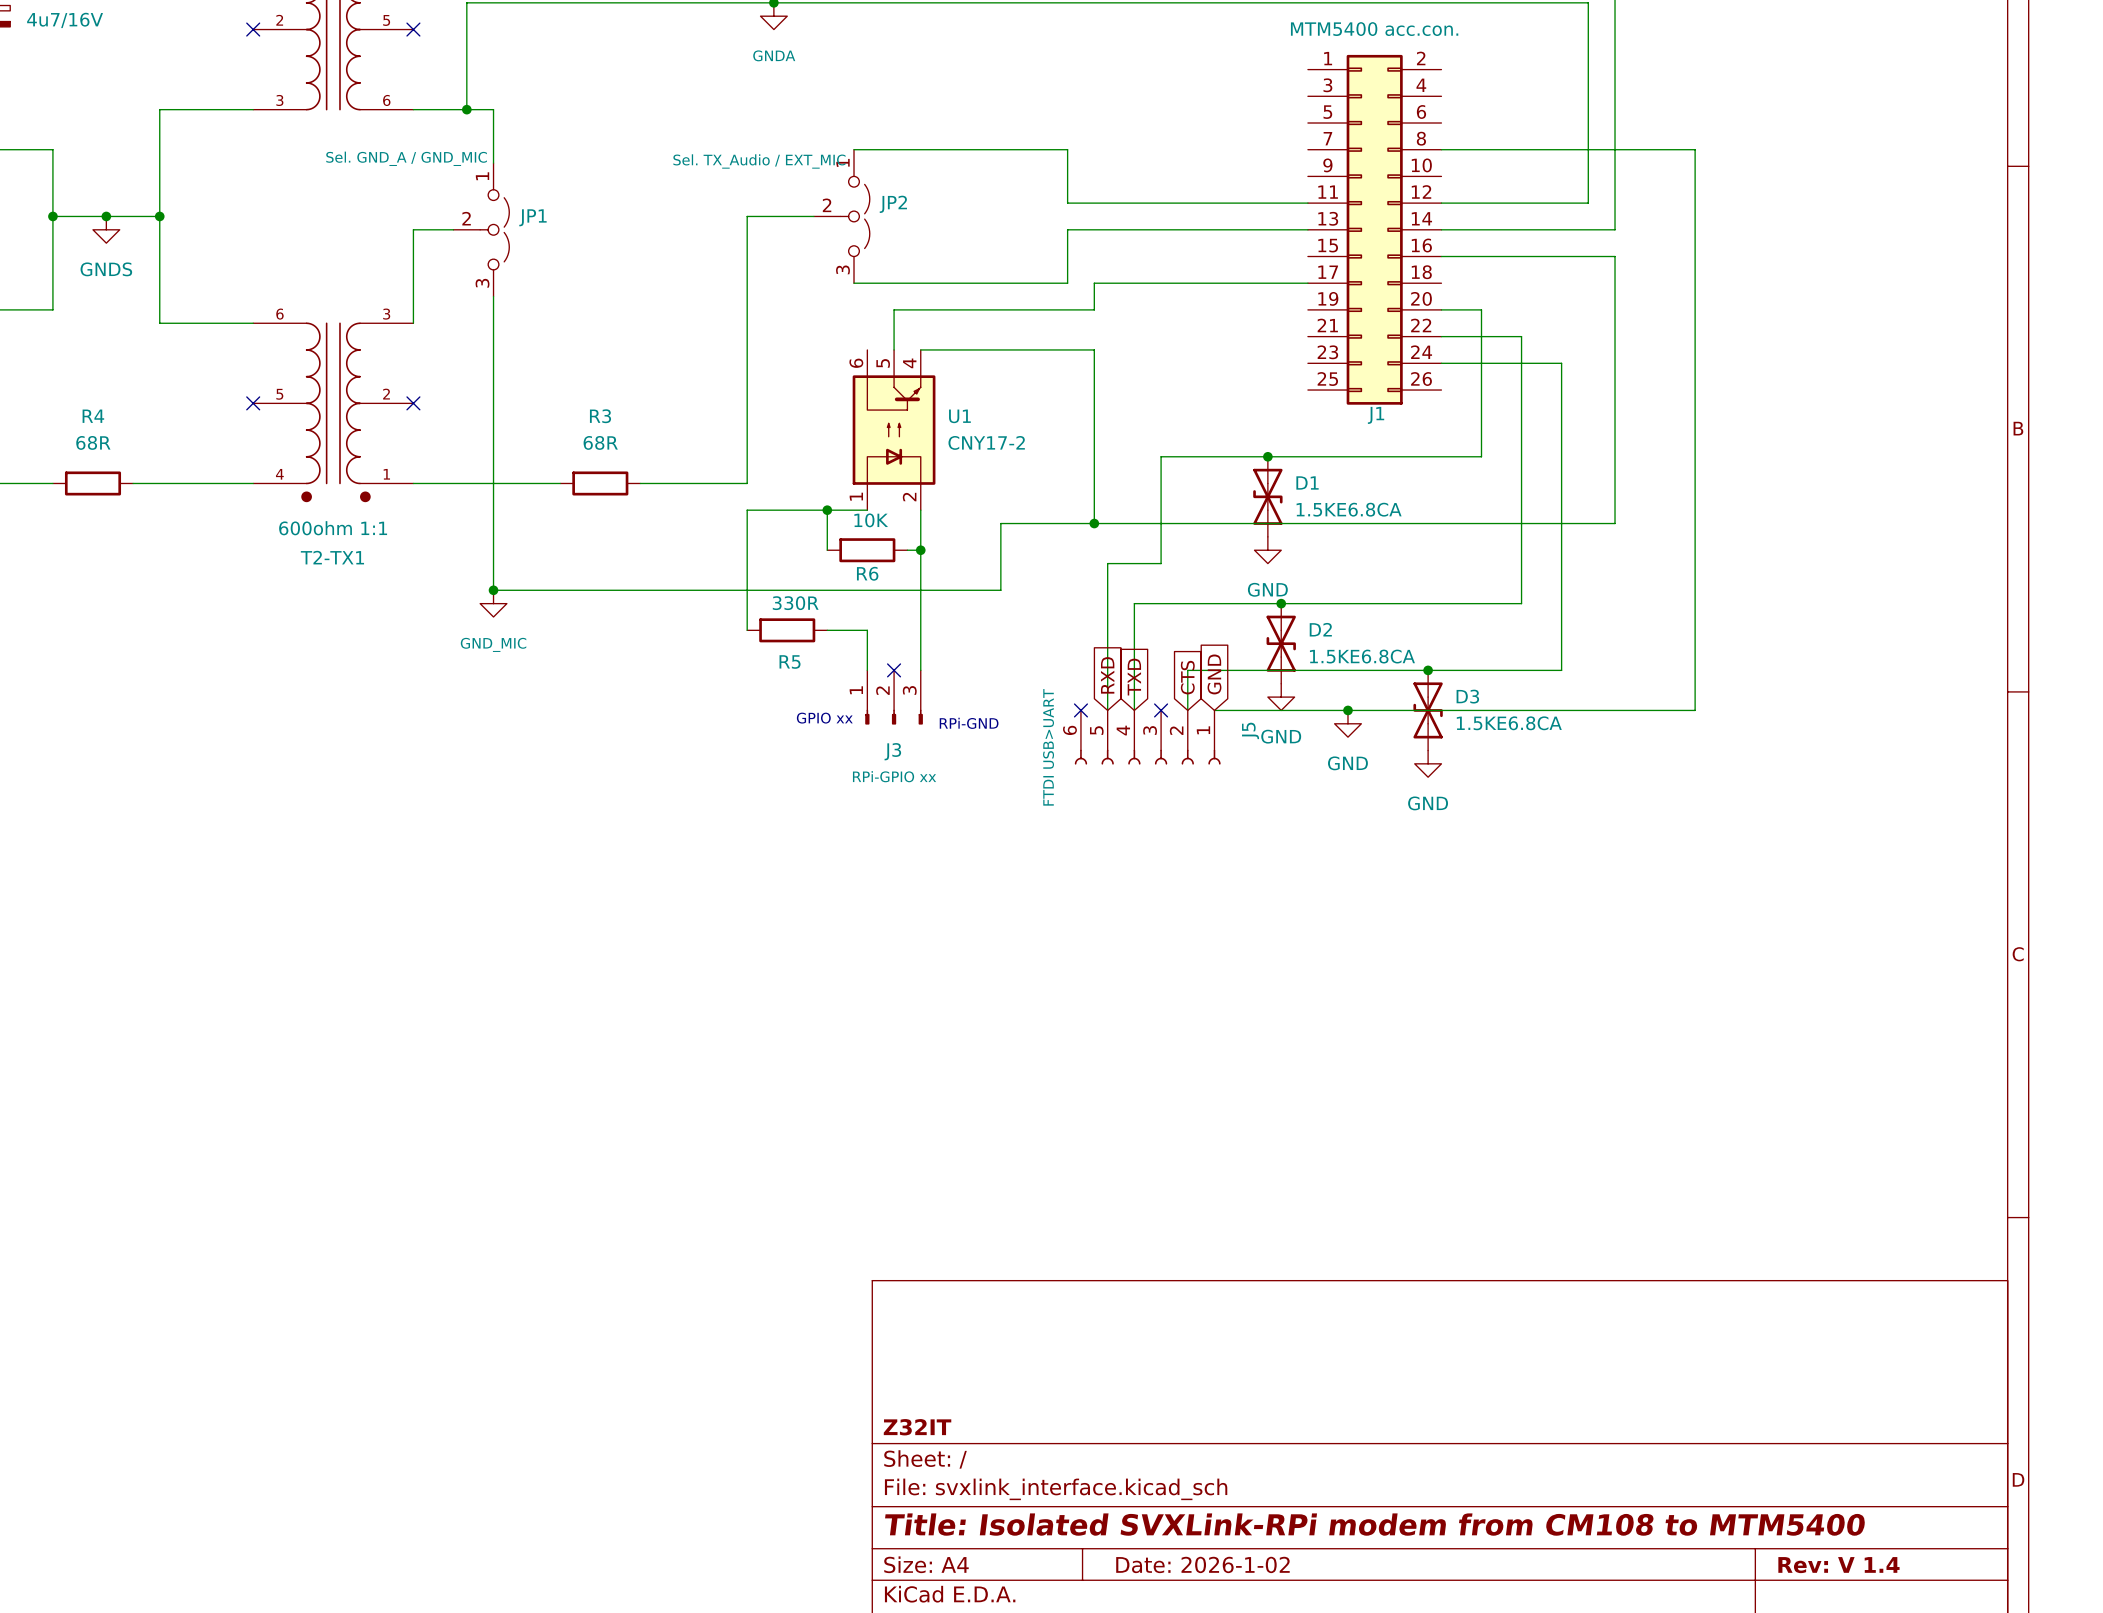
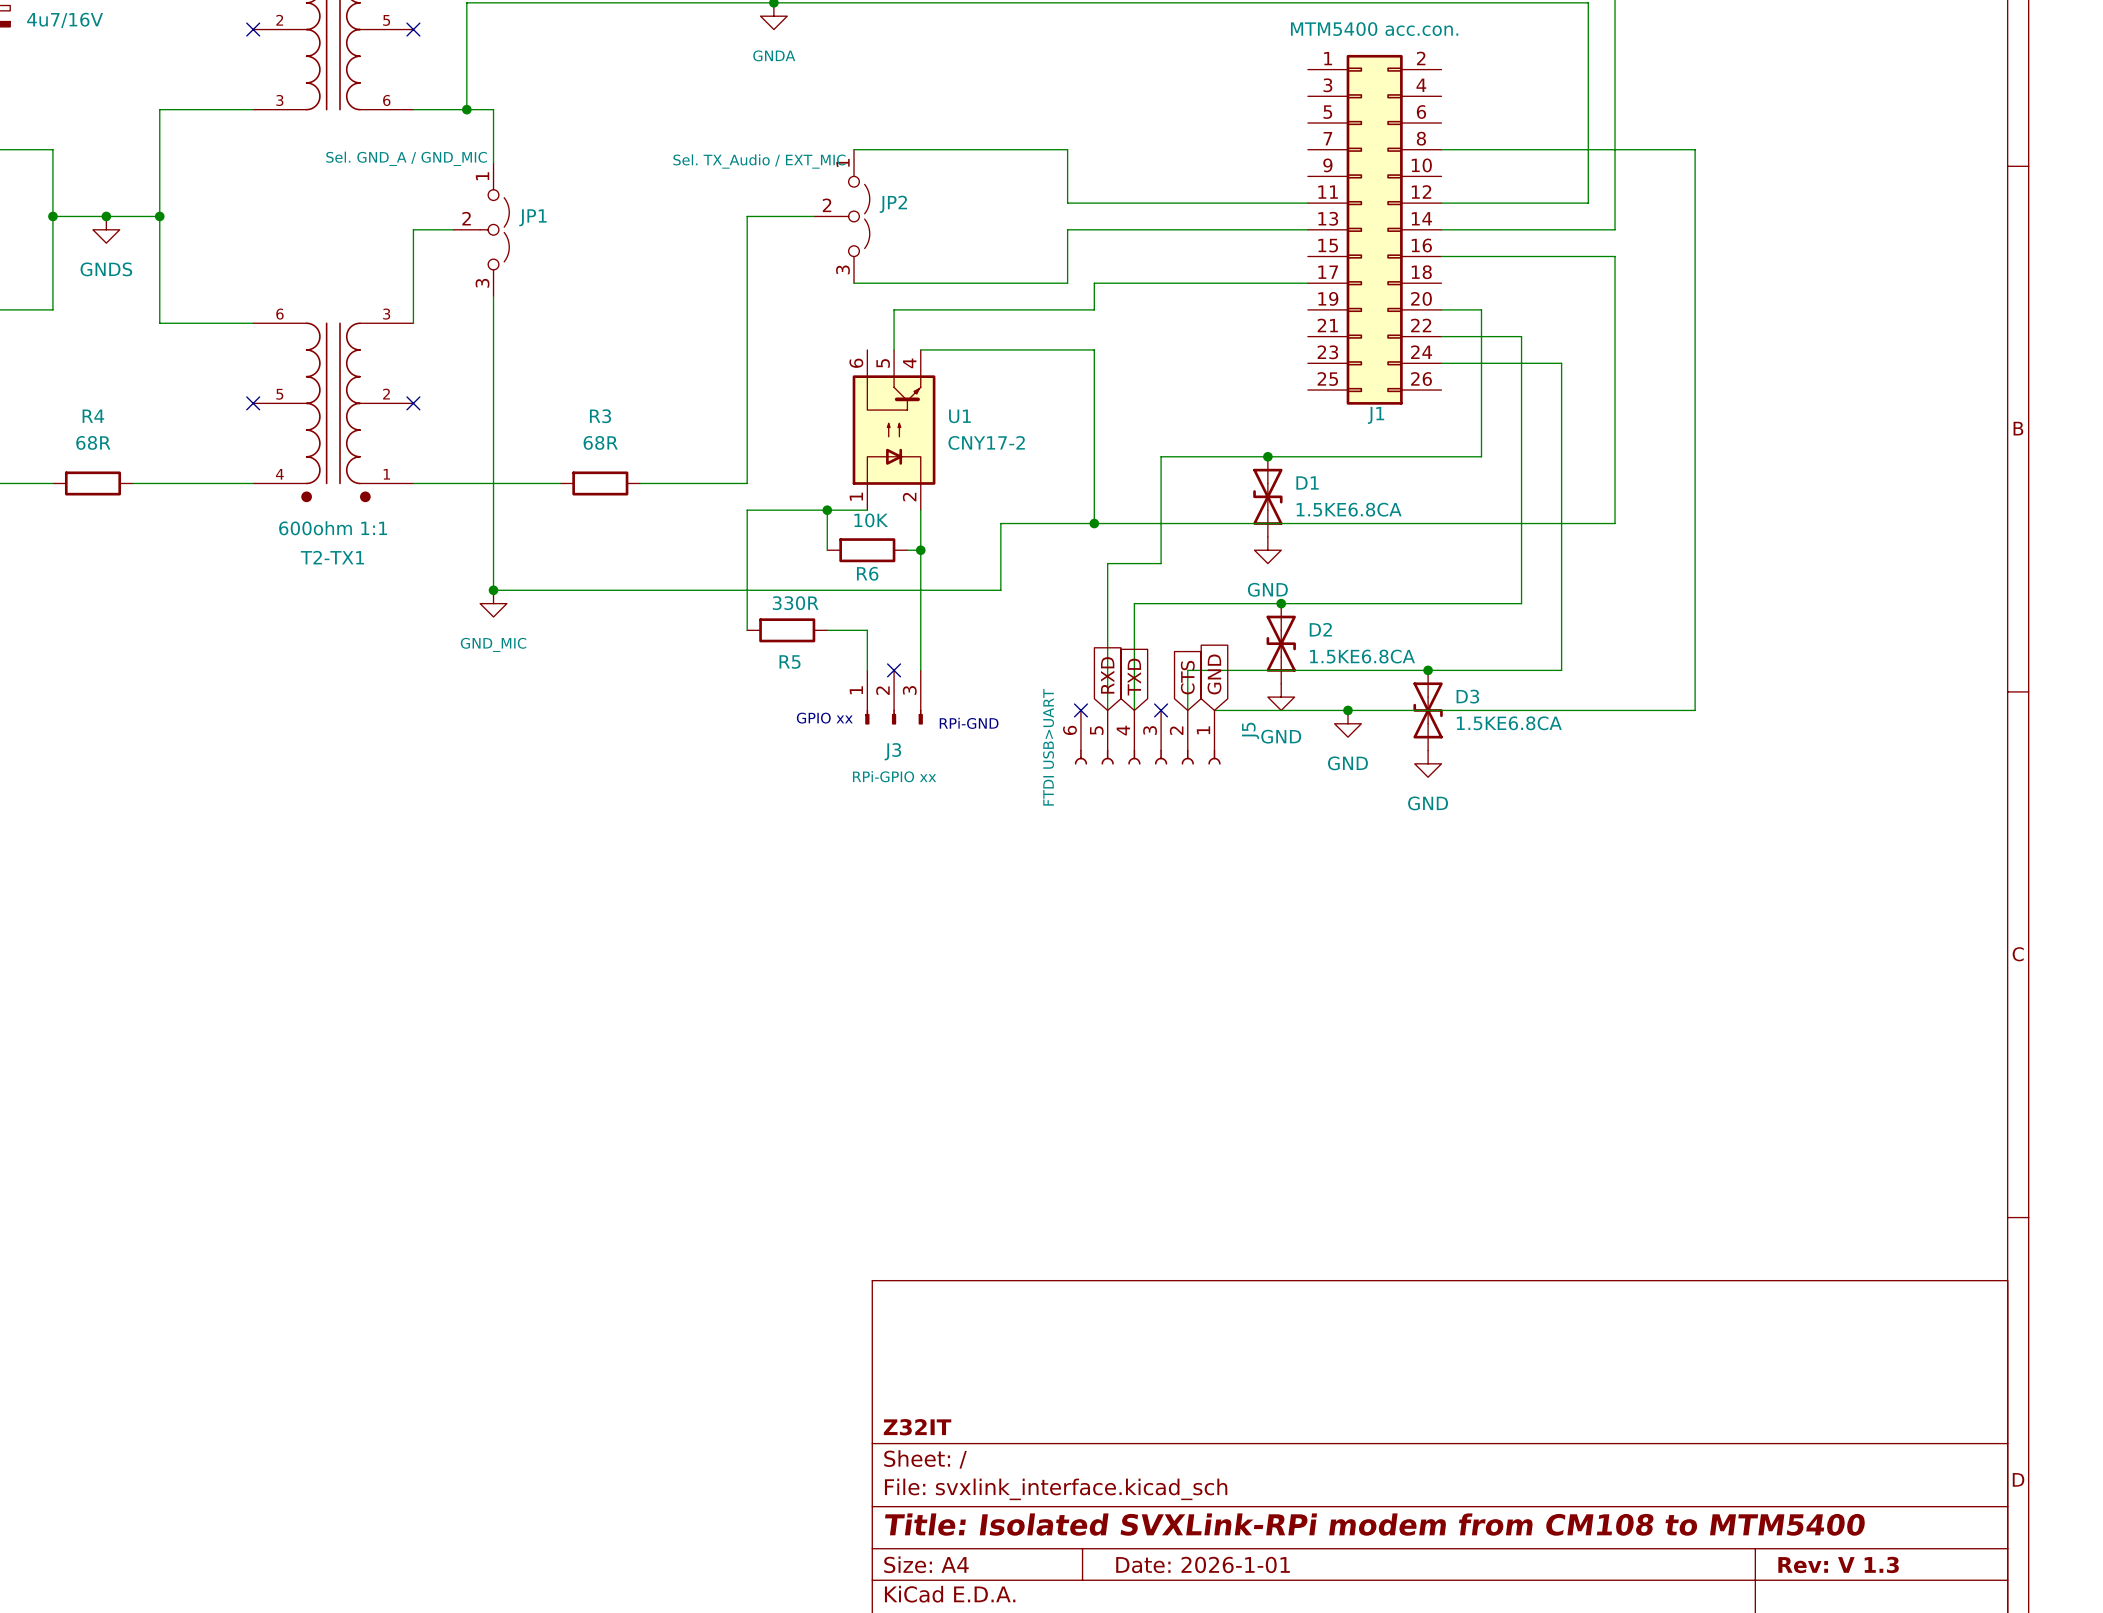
title block: Date: 2026-1-02 (1202, 1564) -> Date: 2026-1-01 (1203, 1564)
title block: Rev: V 1.4 (1838, 1565) -> Rev: V 1.3 (1838, 1564)

